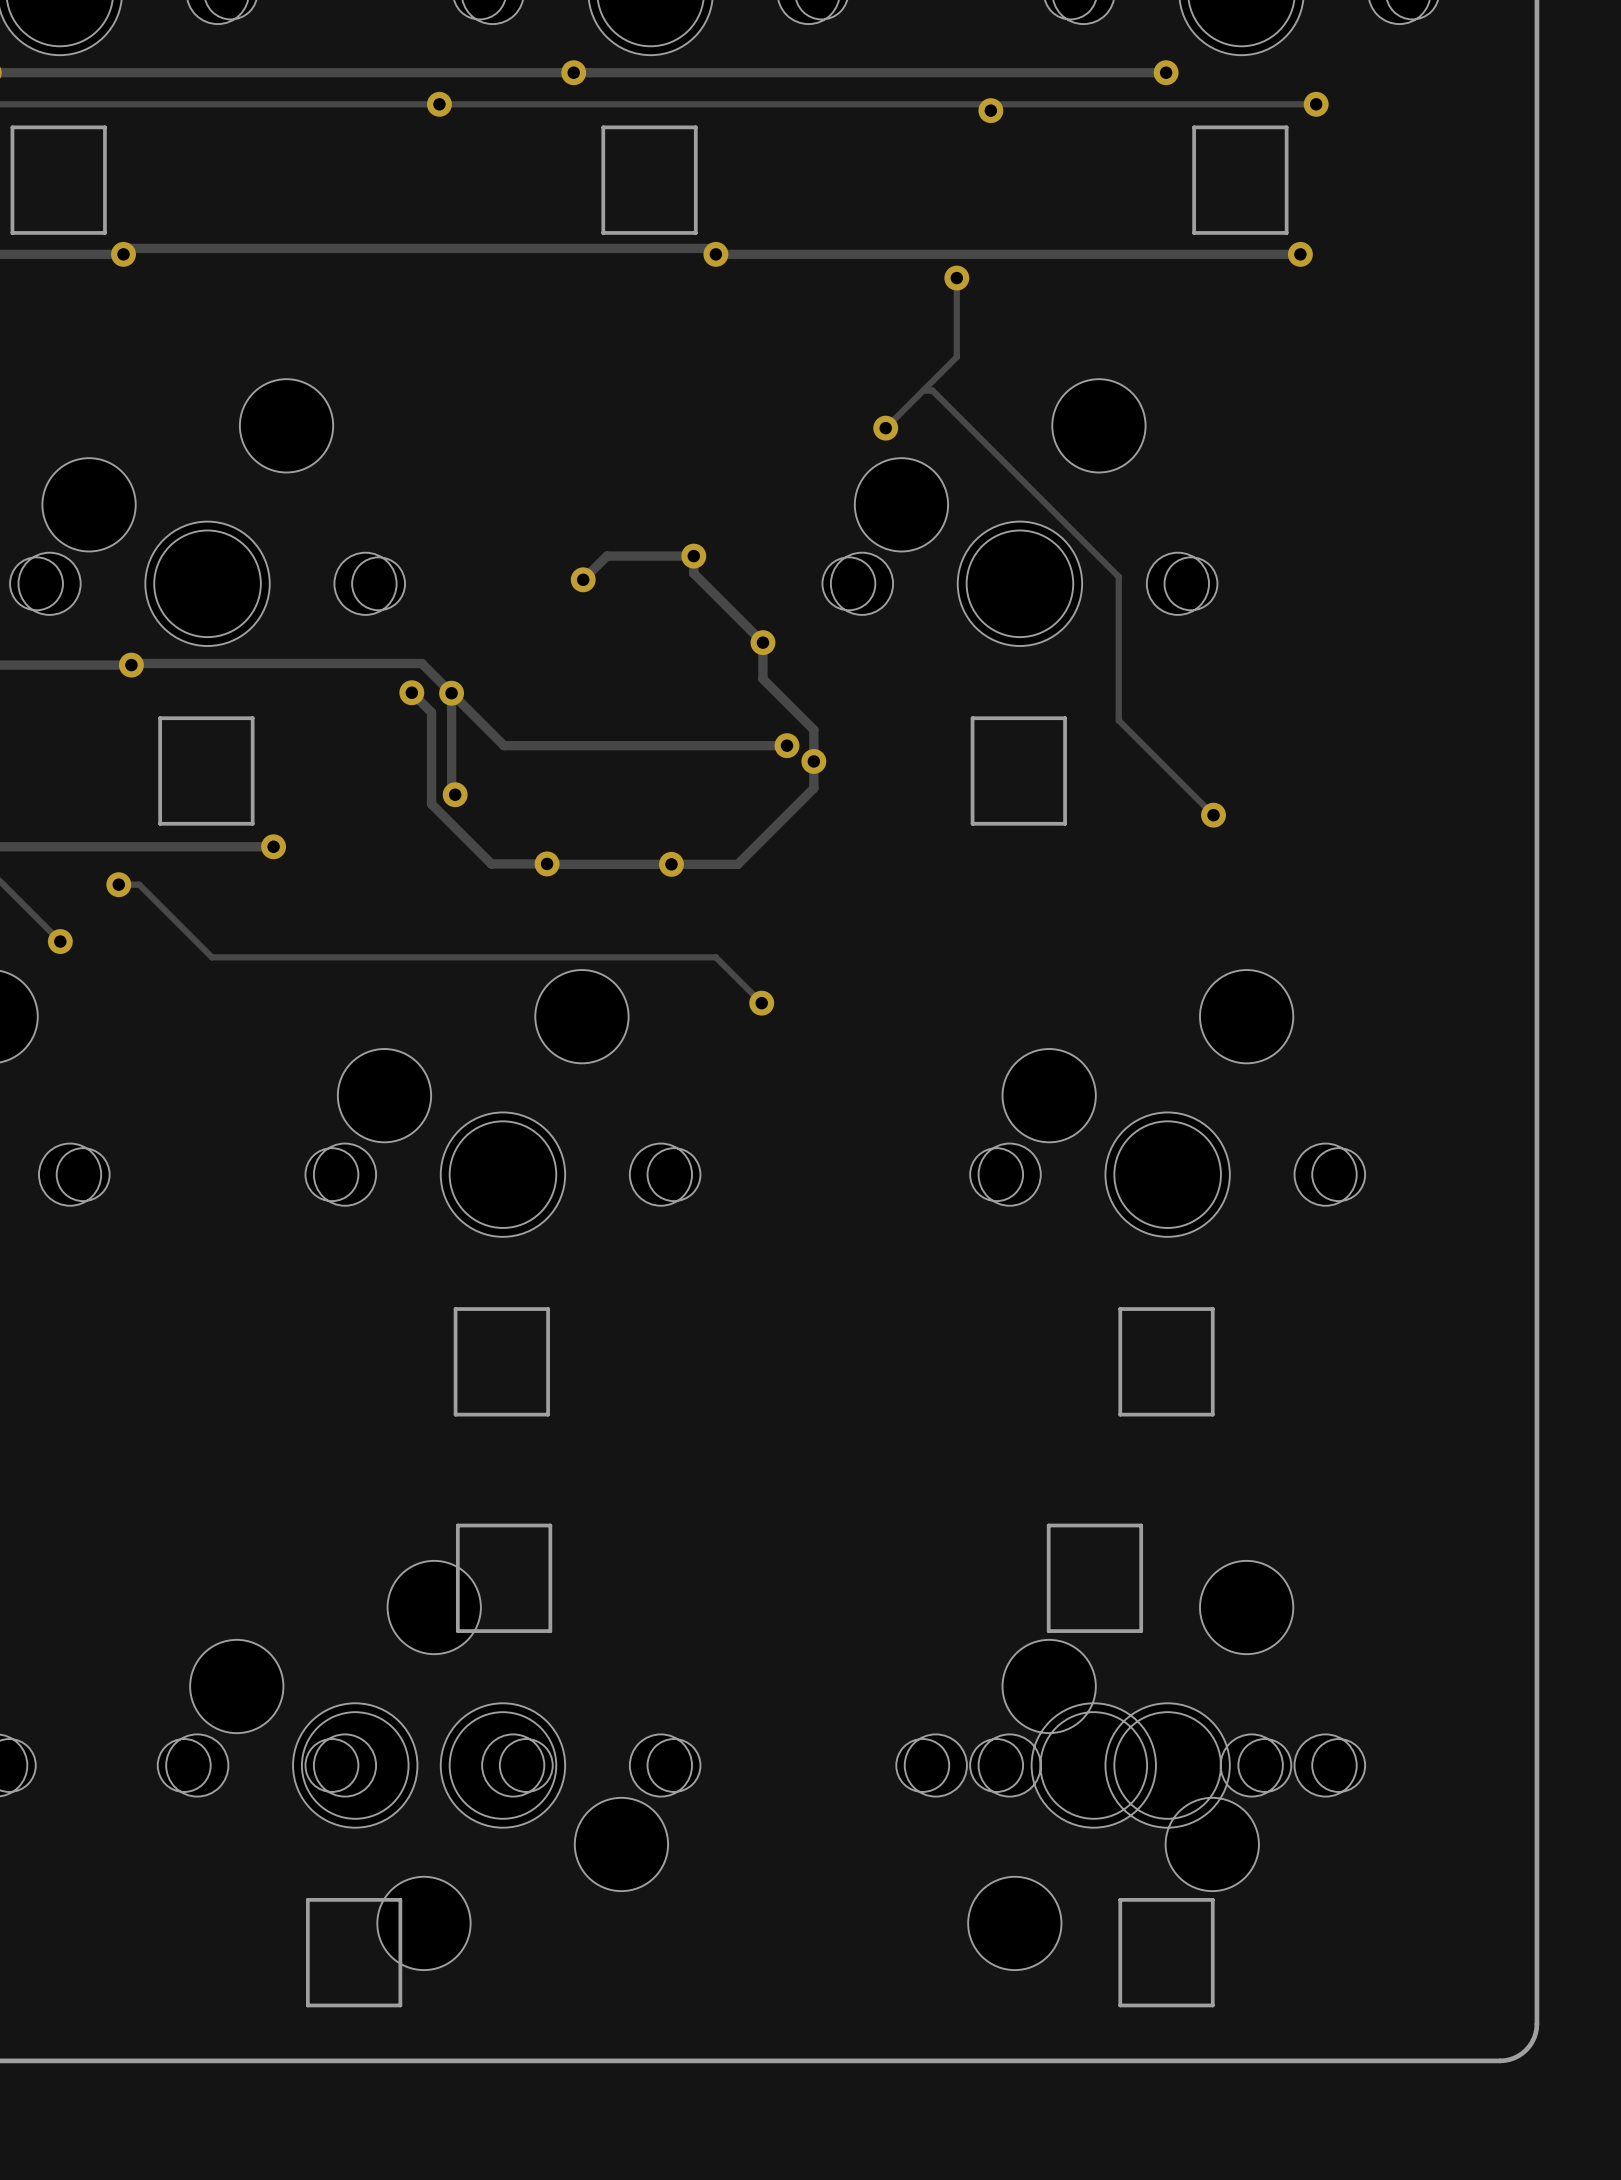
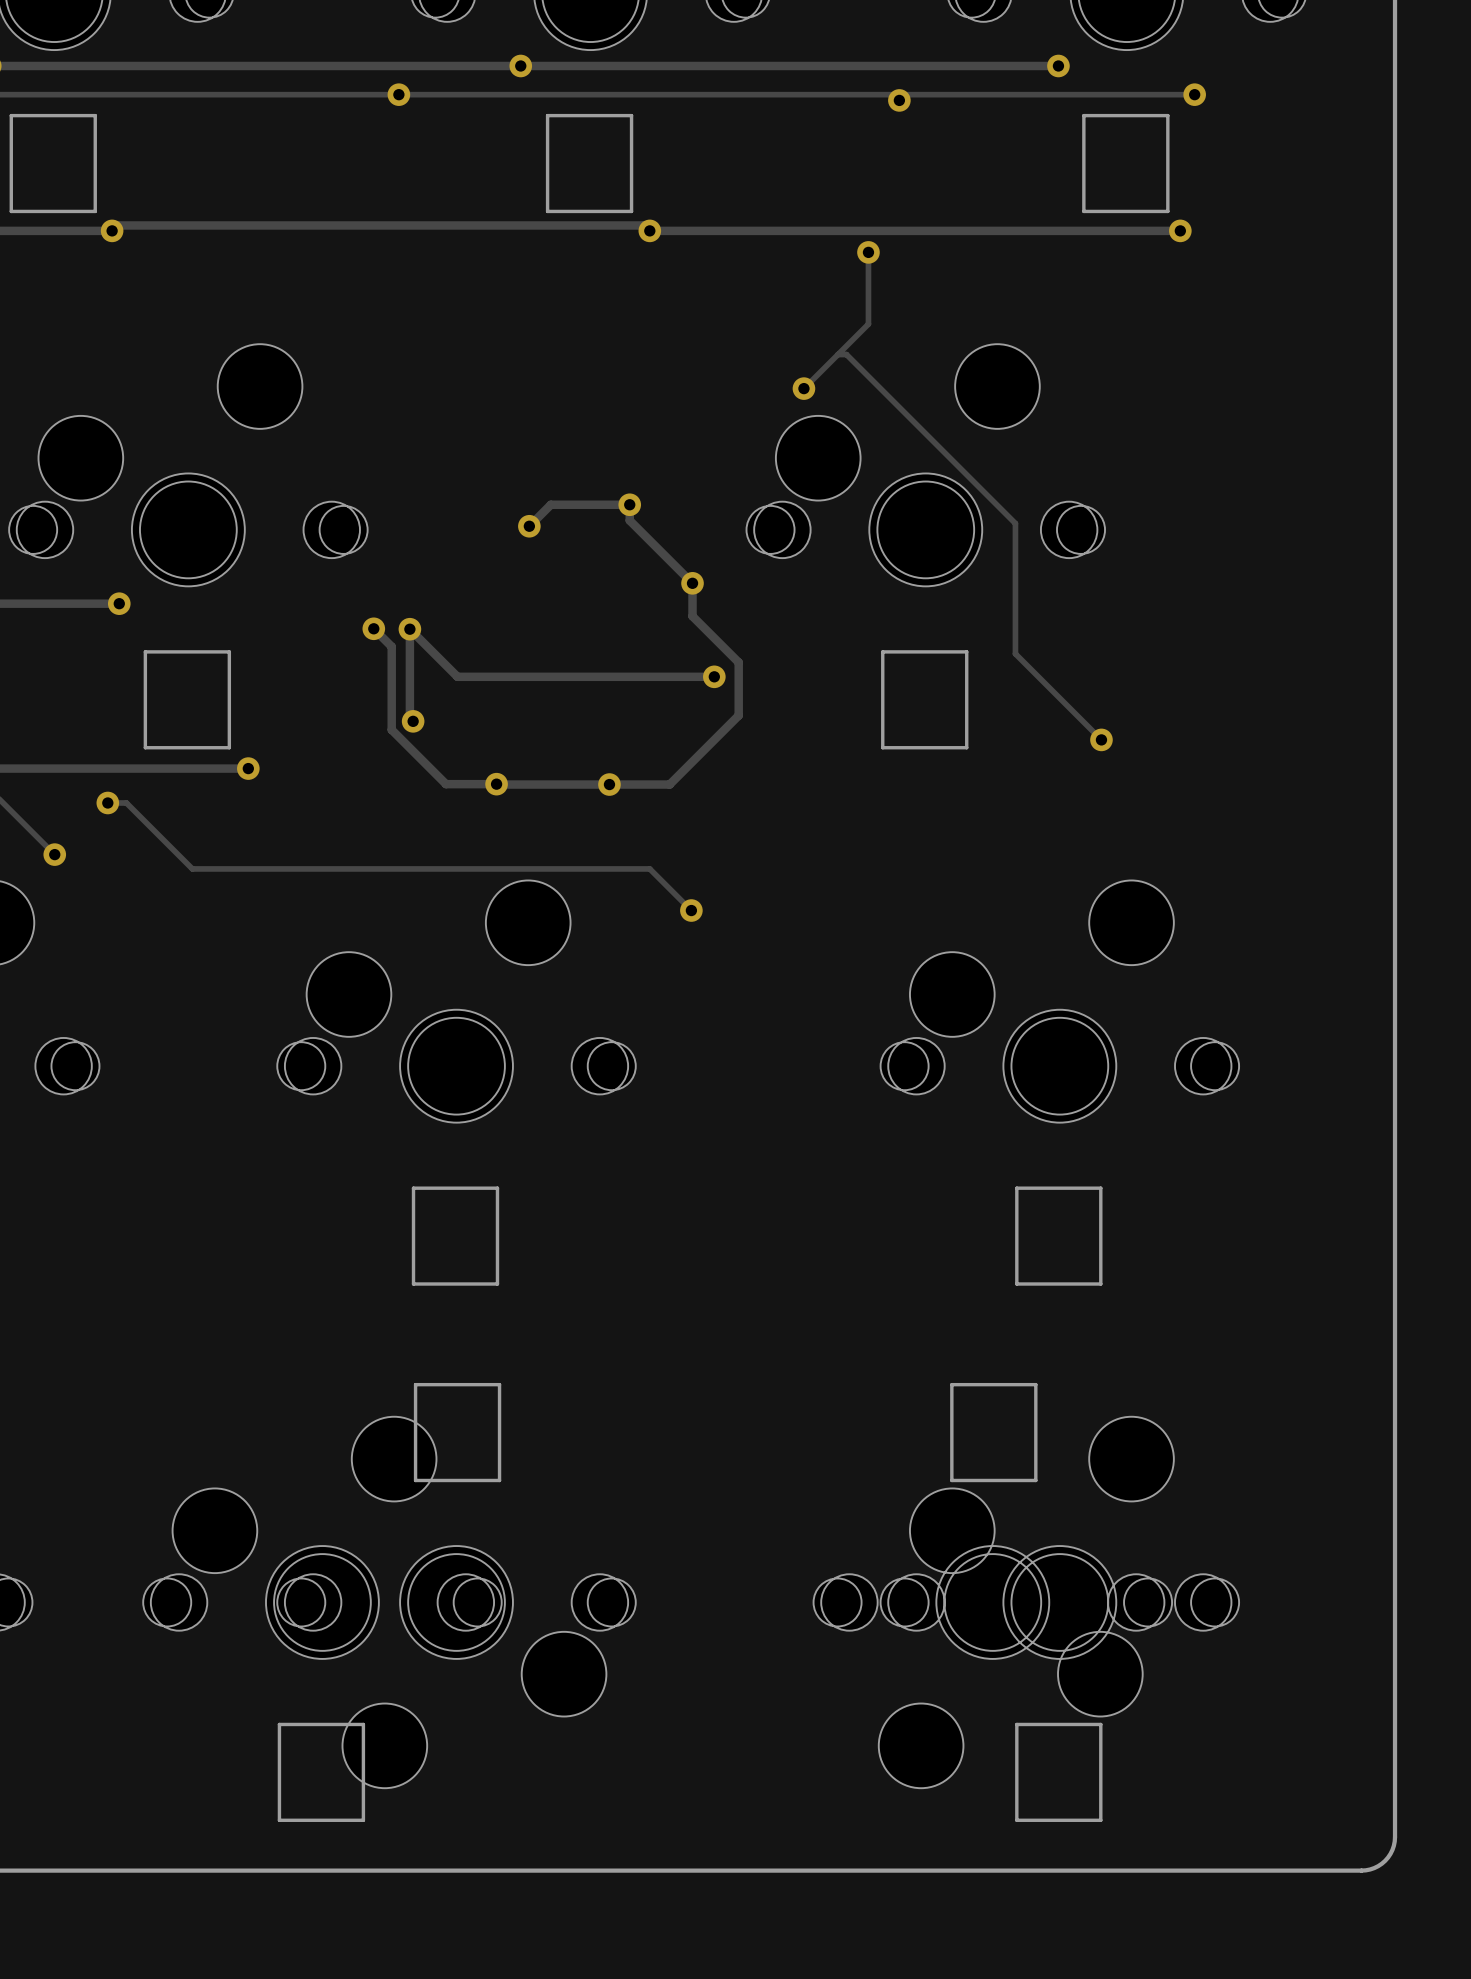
track: (131, 665) (132, 663) (421, 663) (451, 693) -> none
via: (813, 761) -> none

